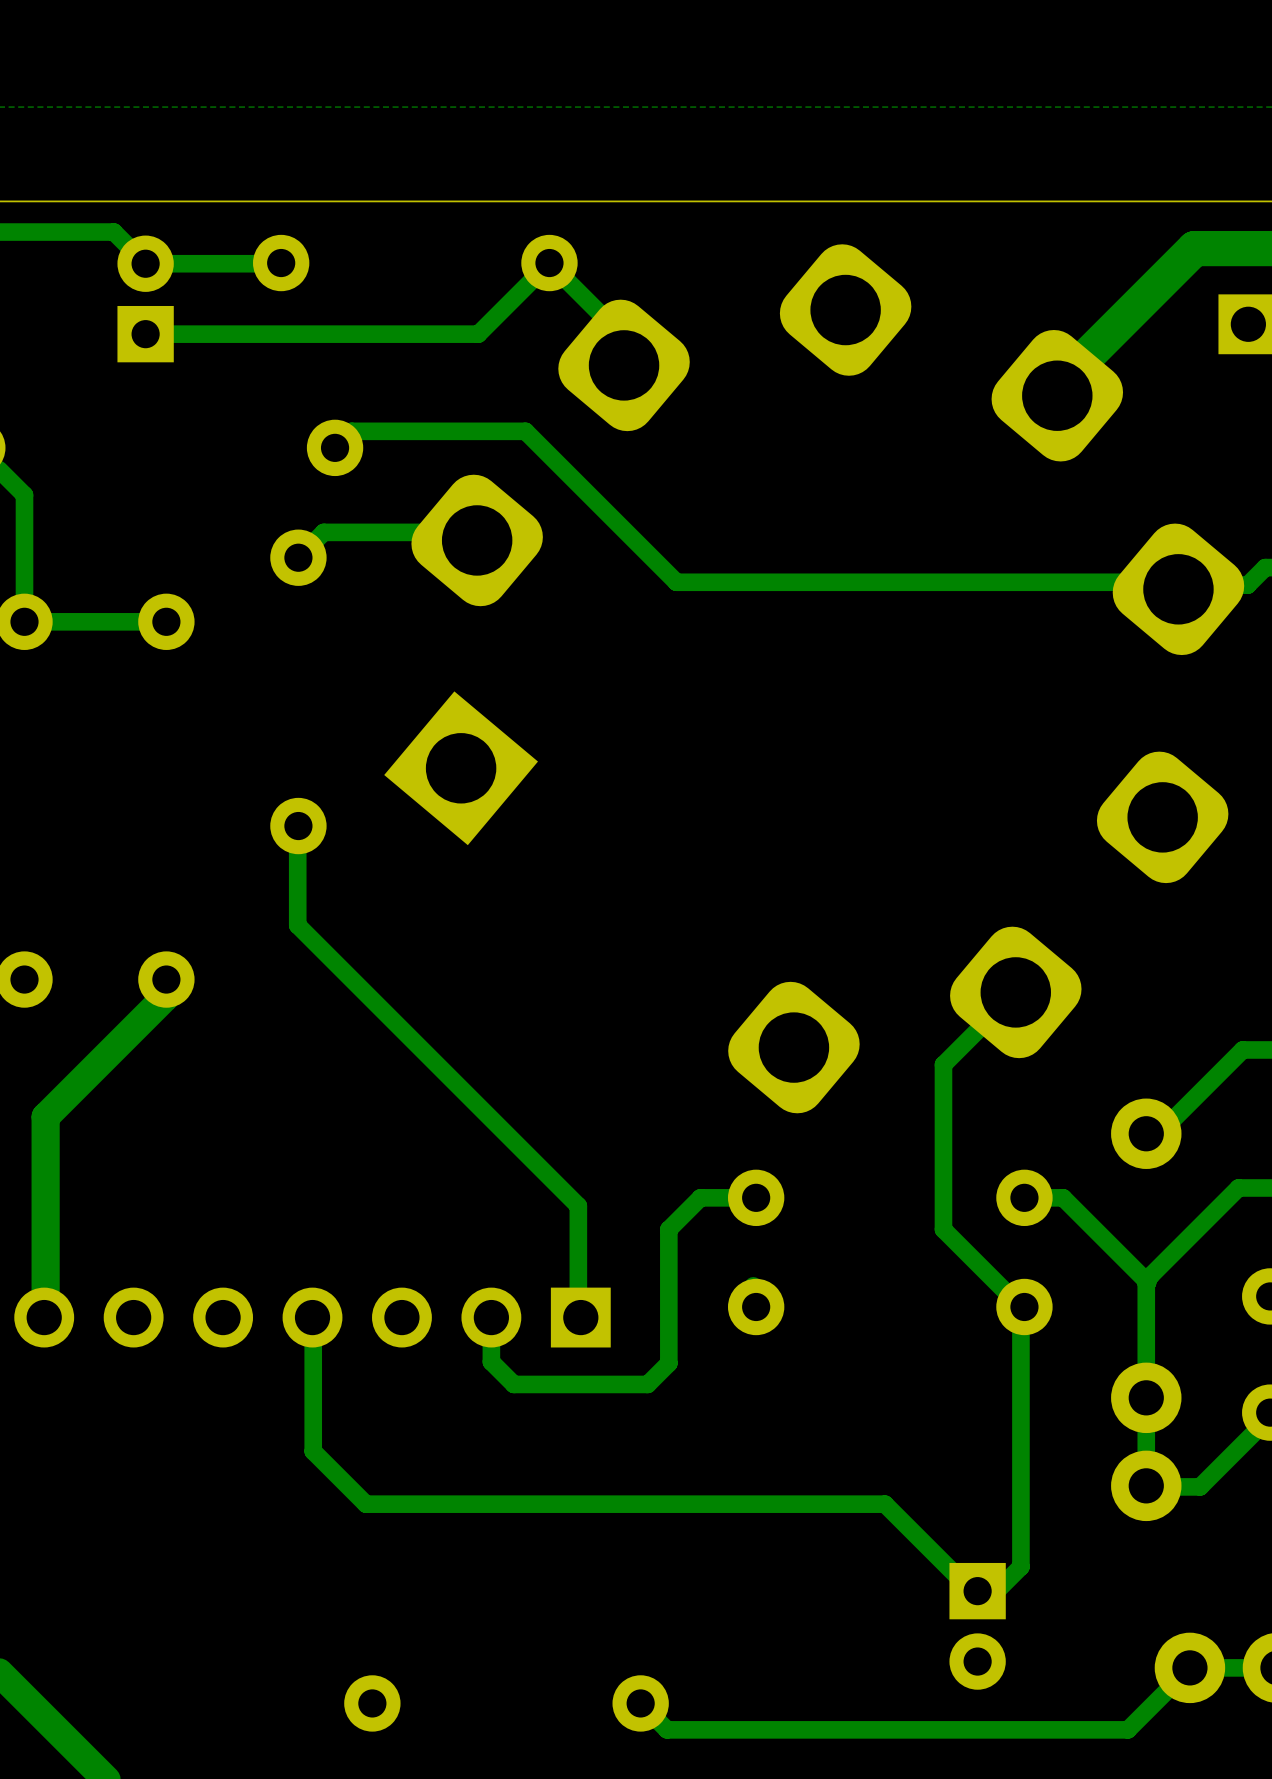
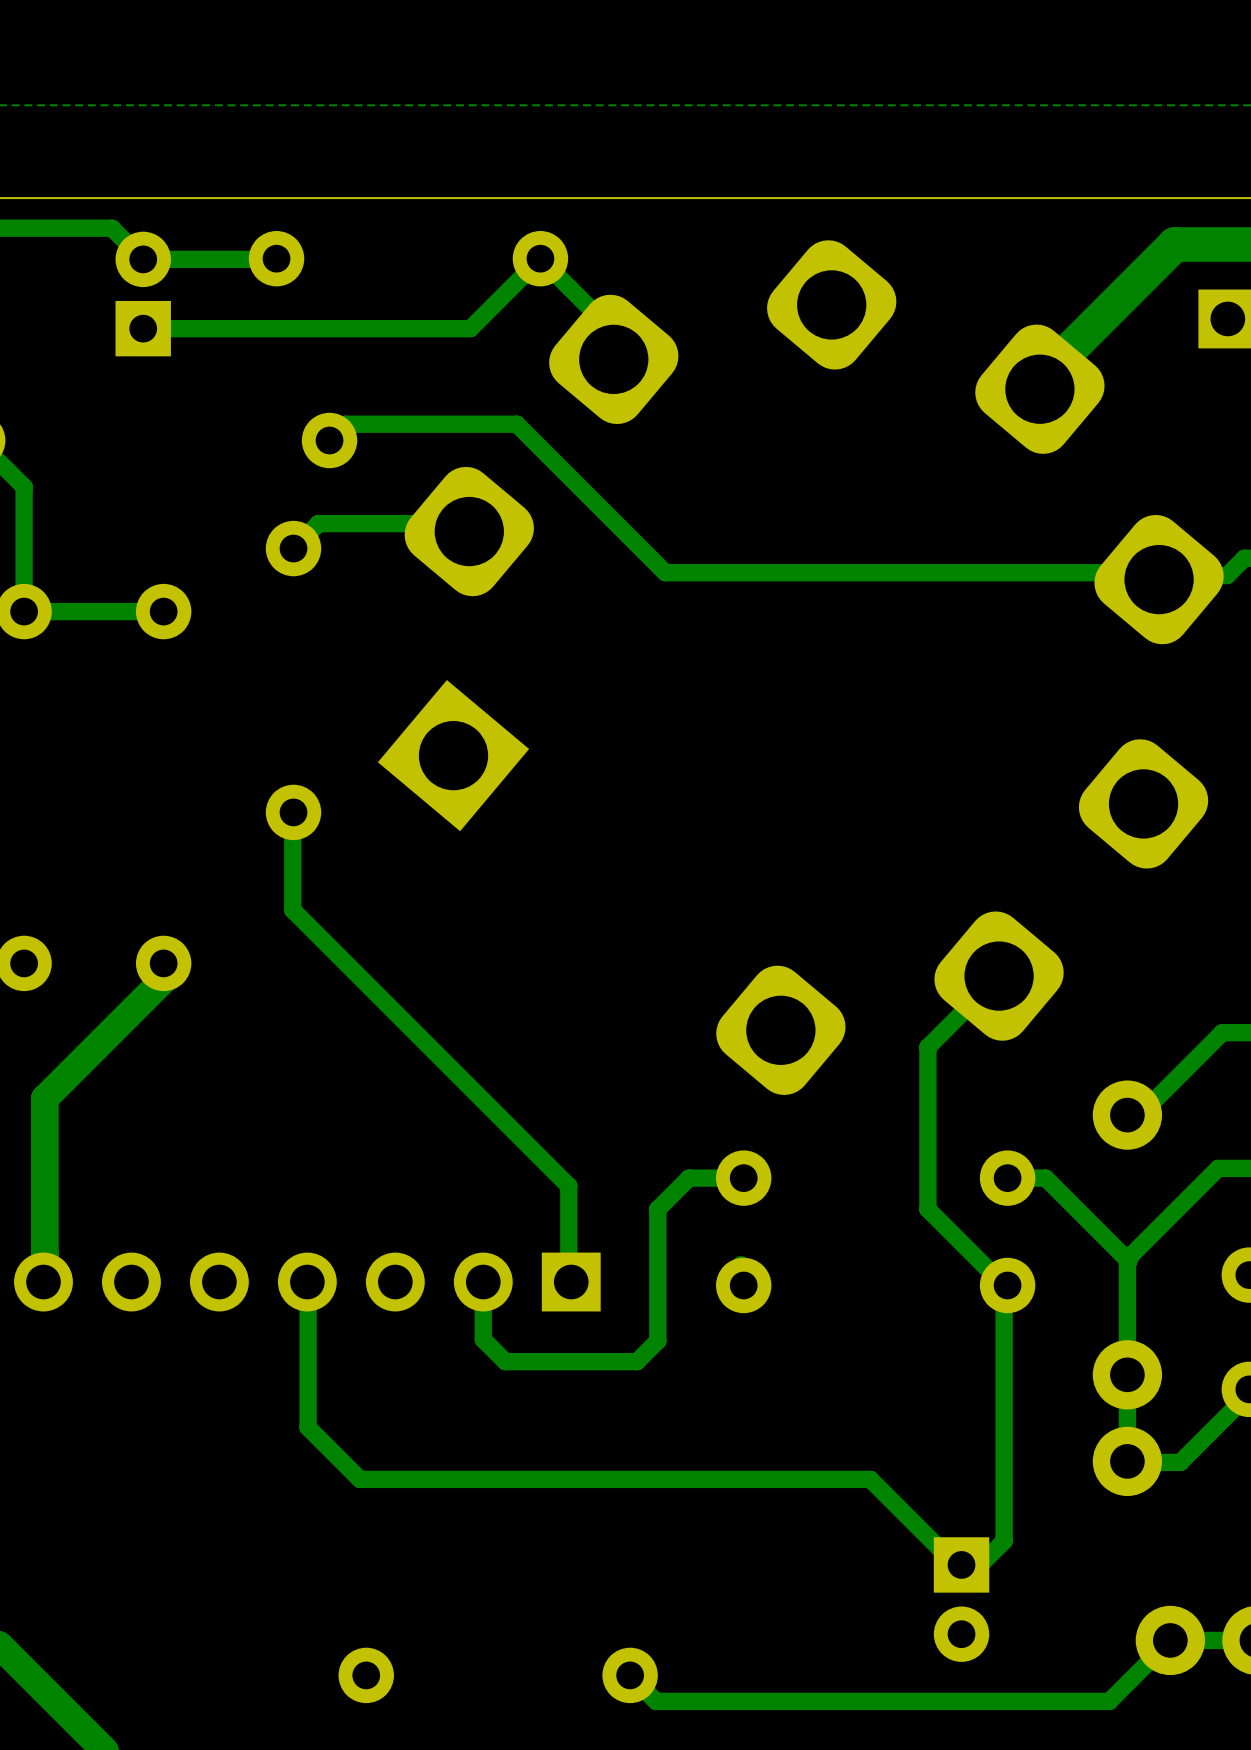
part position: (312, 1317) -> (307, 1282)

